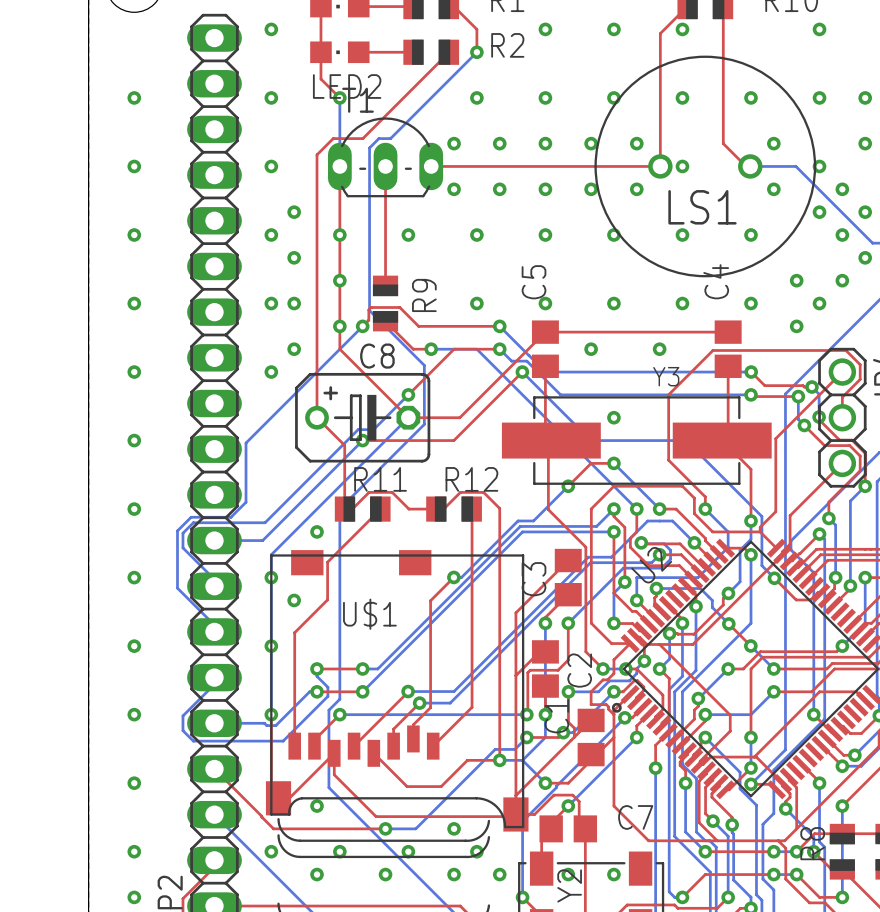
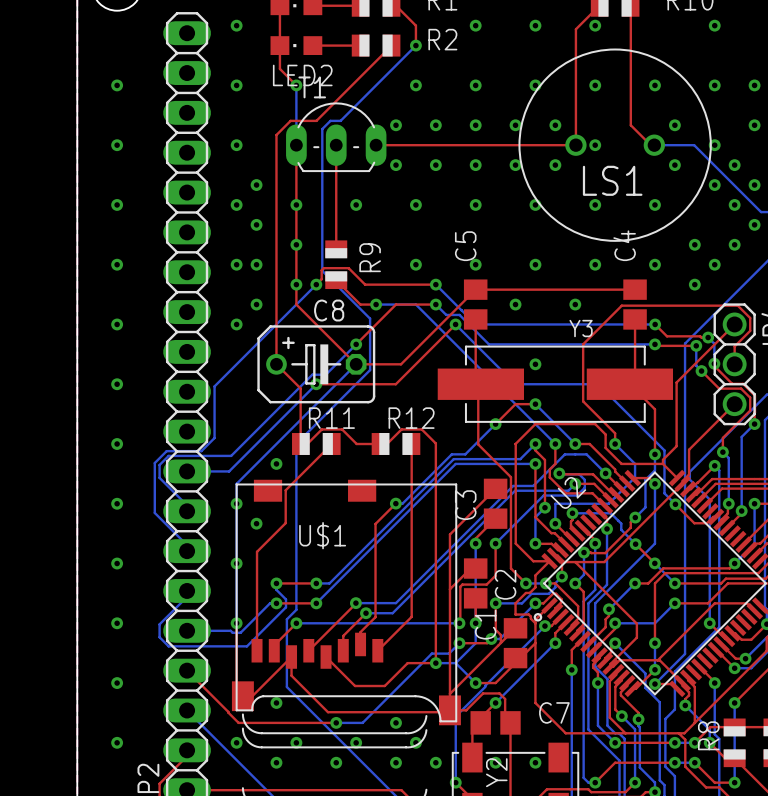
via: (134, 897) -> none

